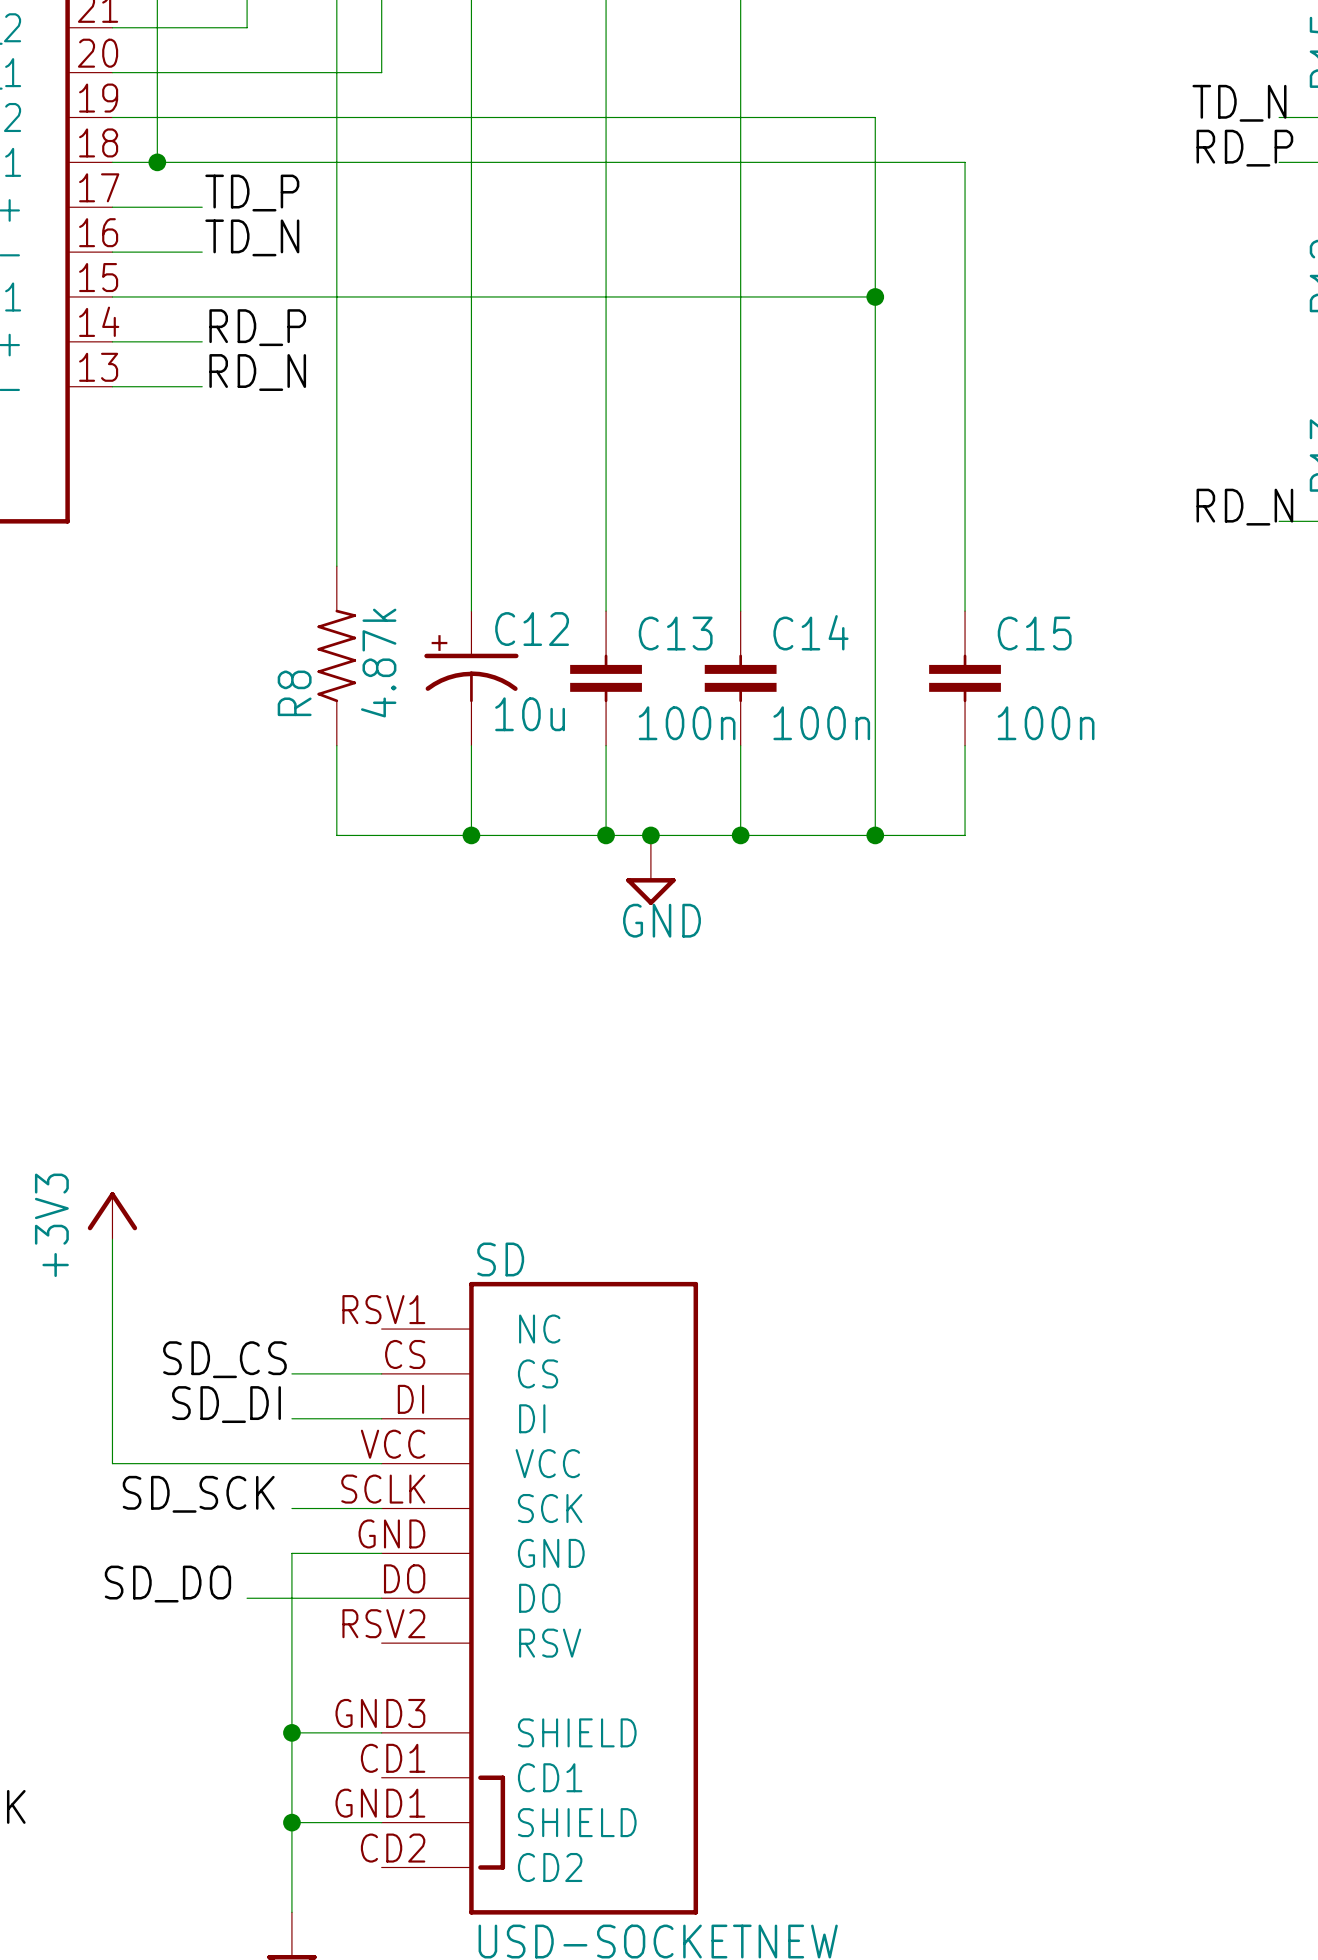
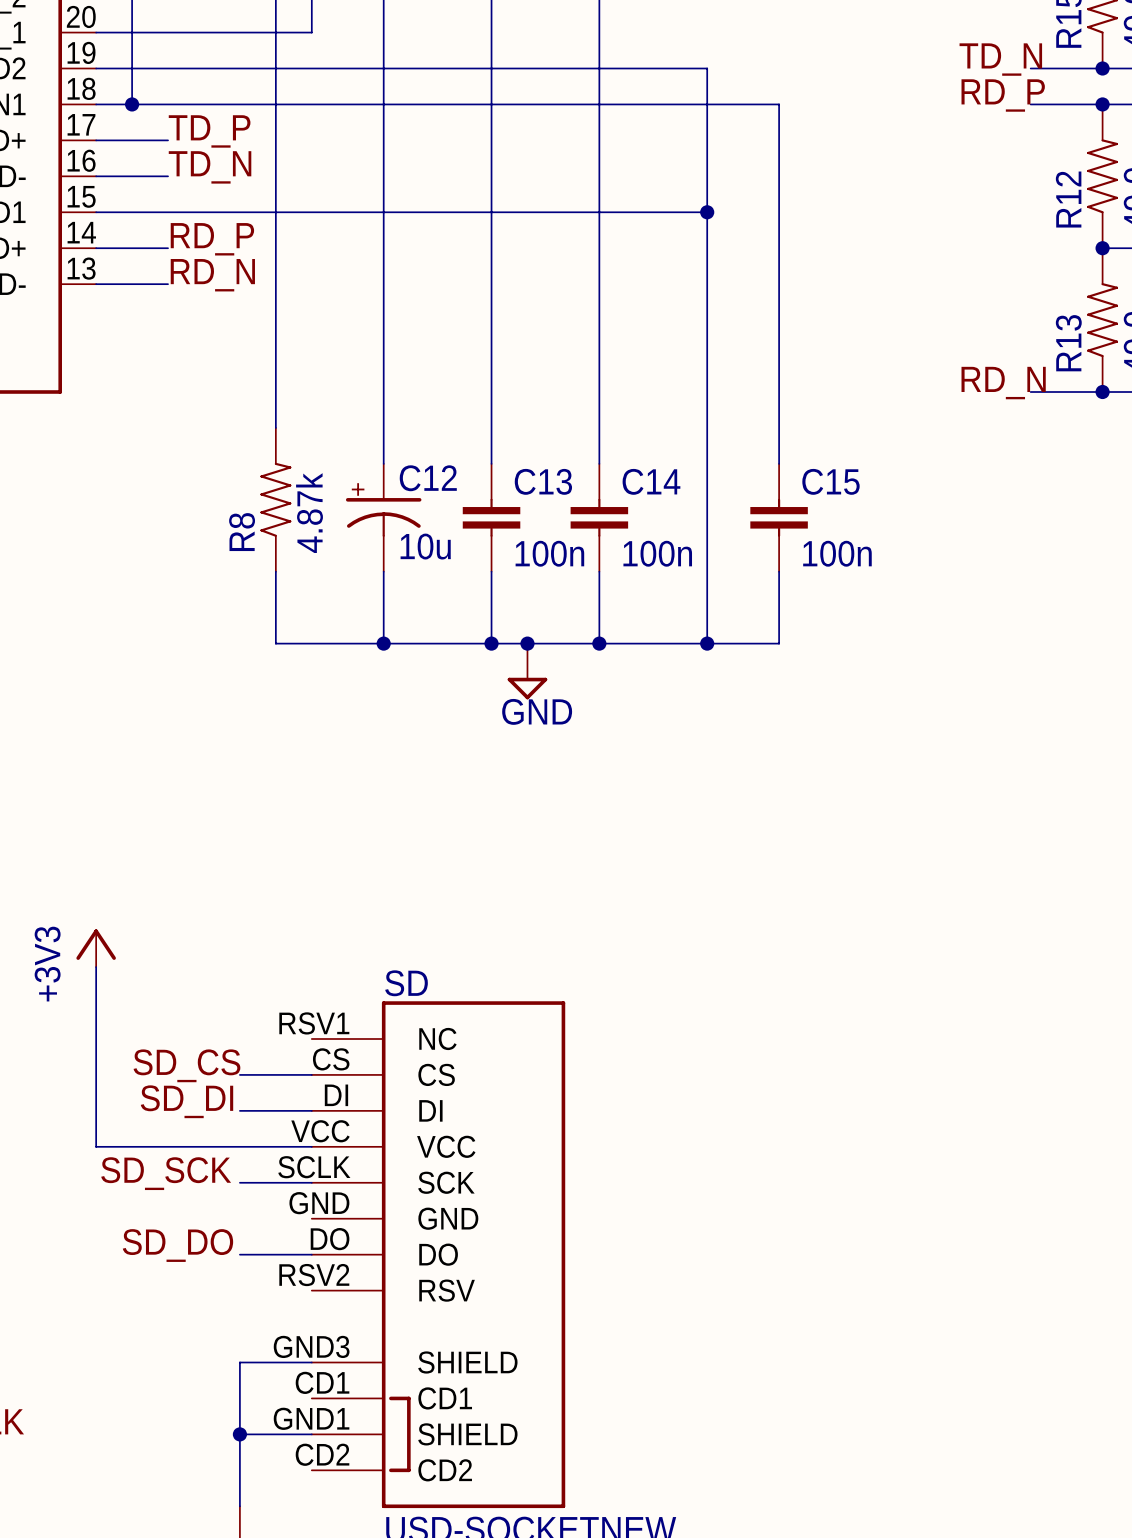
wire: (381, 1553) (291, 1553) (291, 1732) -> none
label position: SD_DO (167, 1584) -> SD_DO (177, 1245)
wire: (247, 1598) (291, 1598) -> none
junction: (291, 1732) -> none

